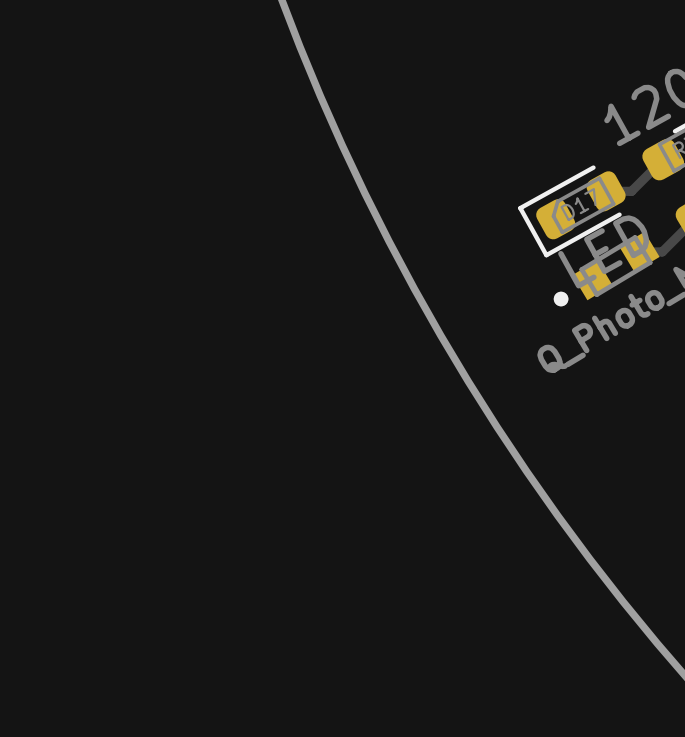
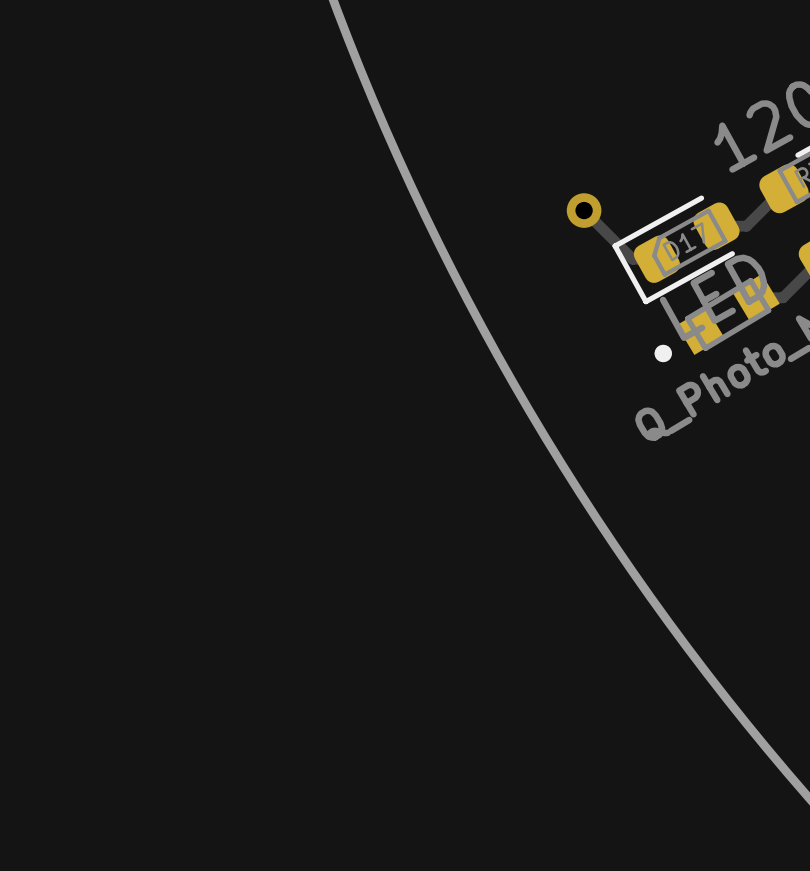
track: none -> (584, 210) (632, 259) (656, 259)
via: none -> (584, 210)

